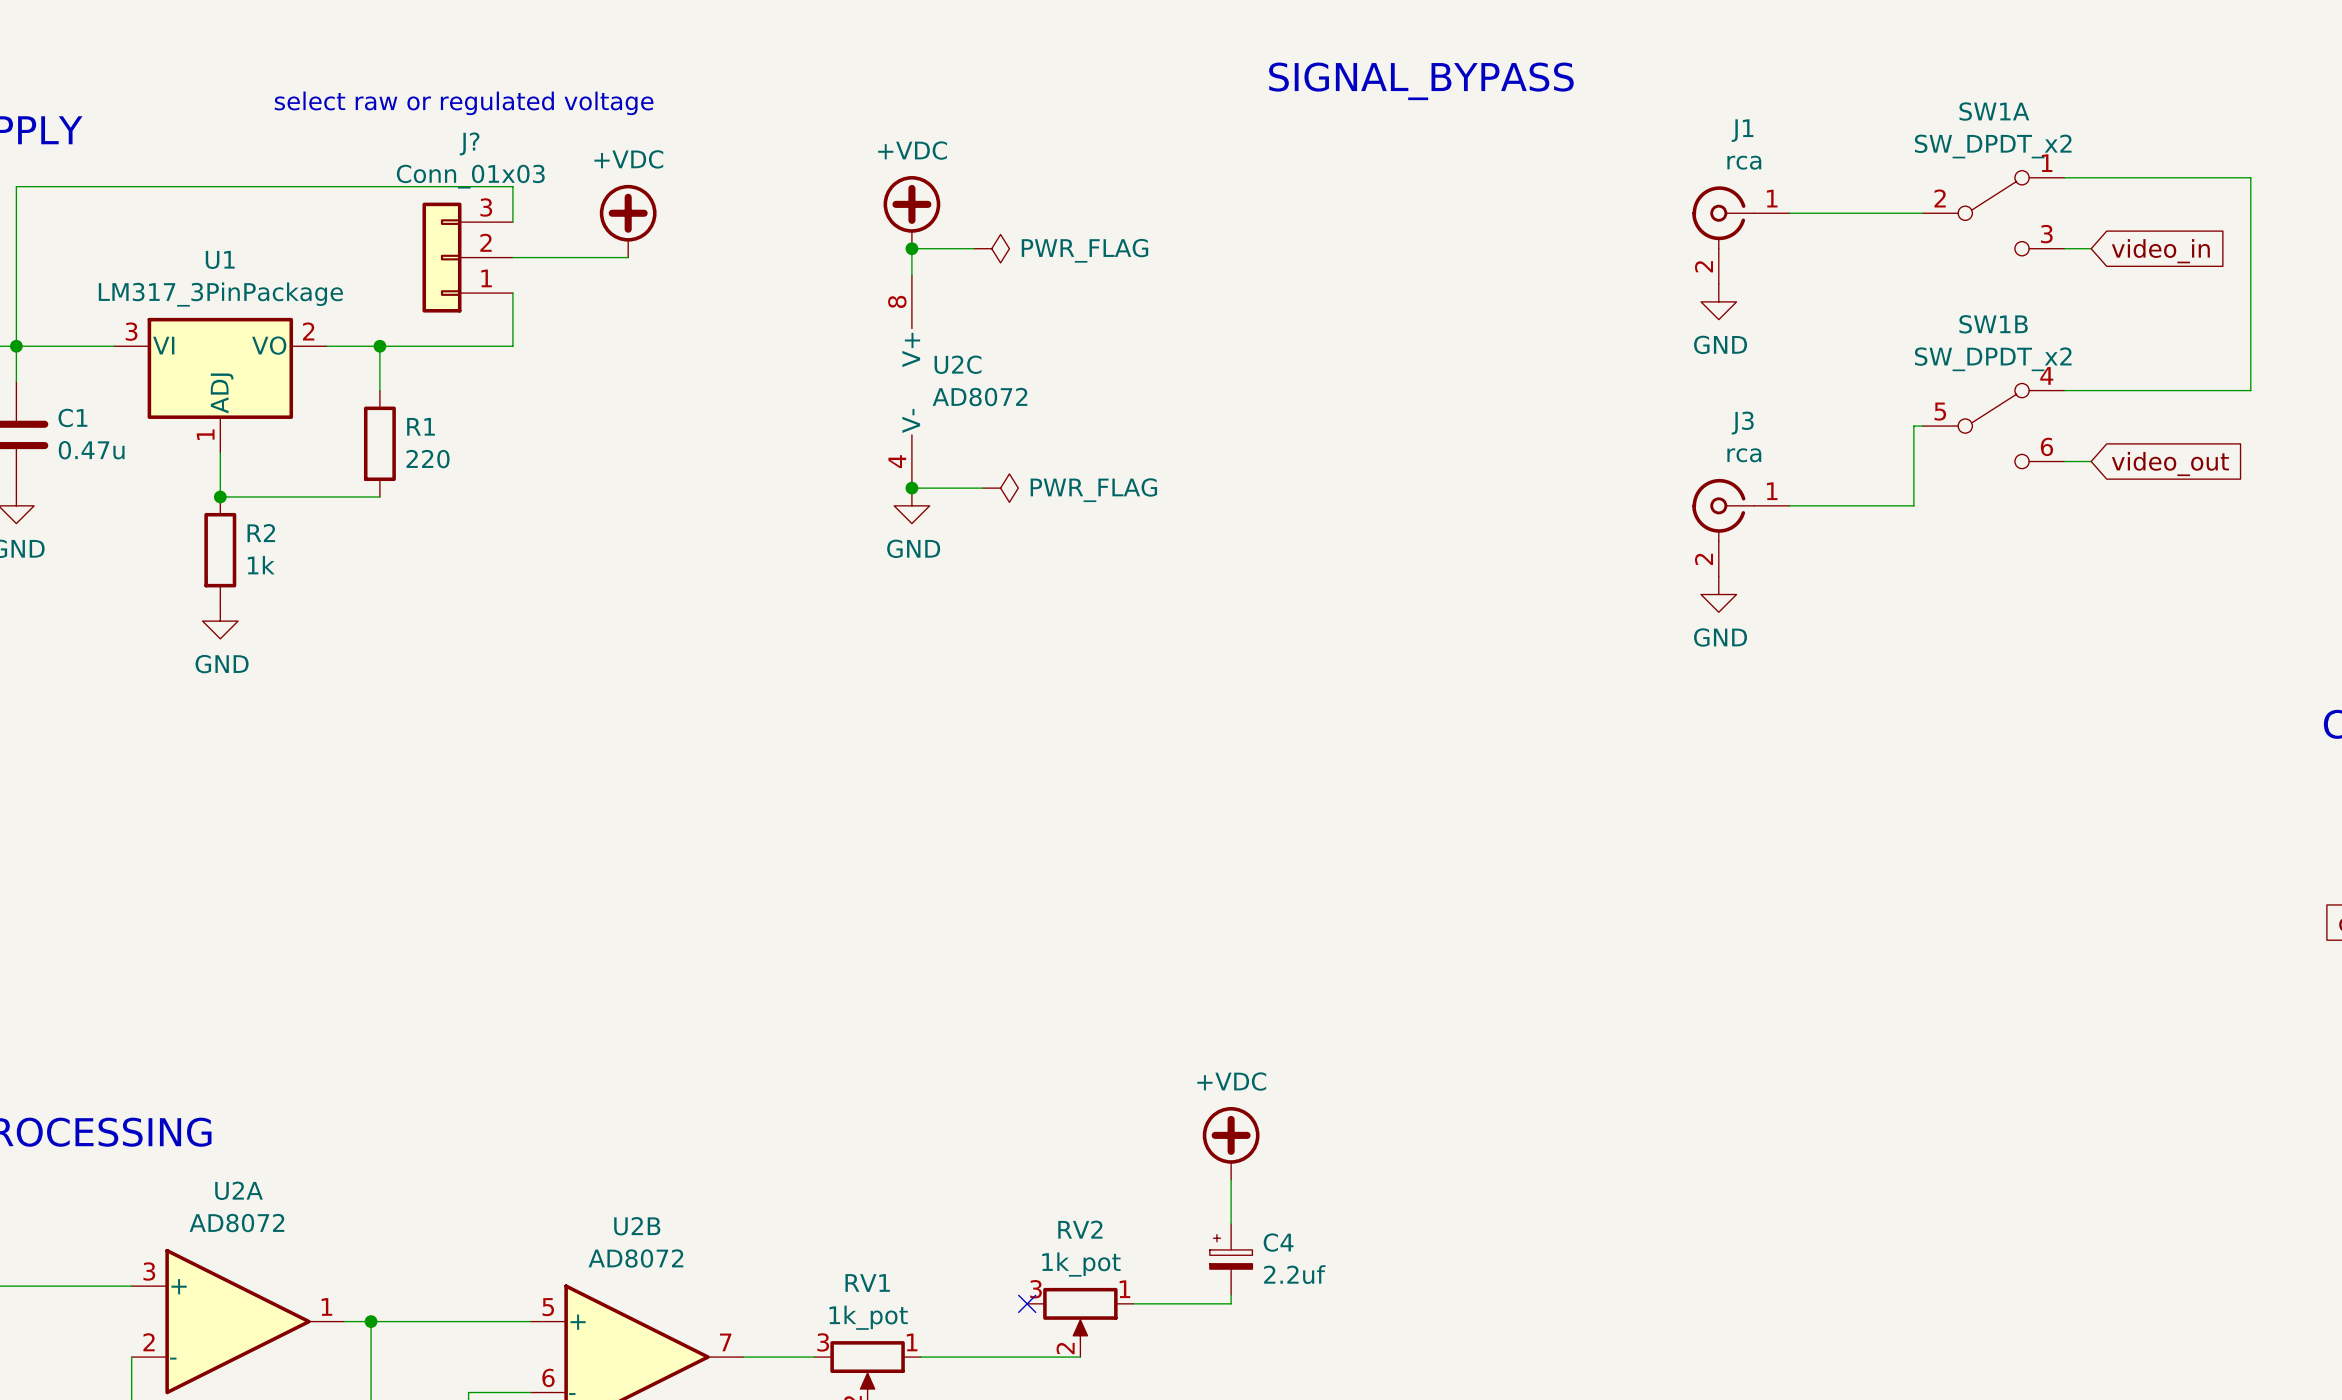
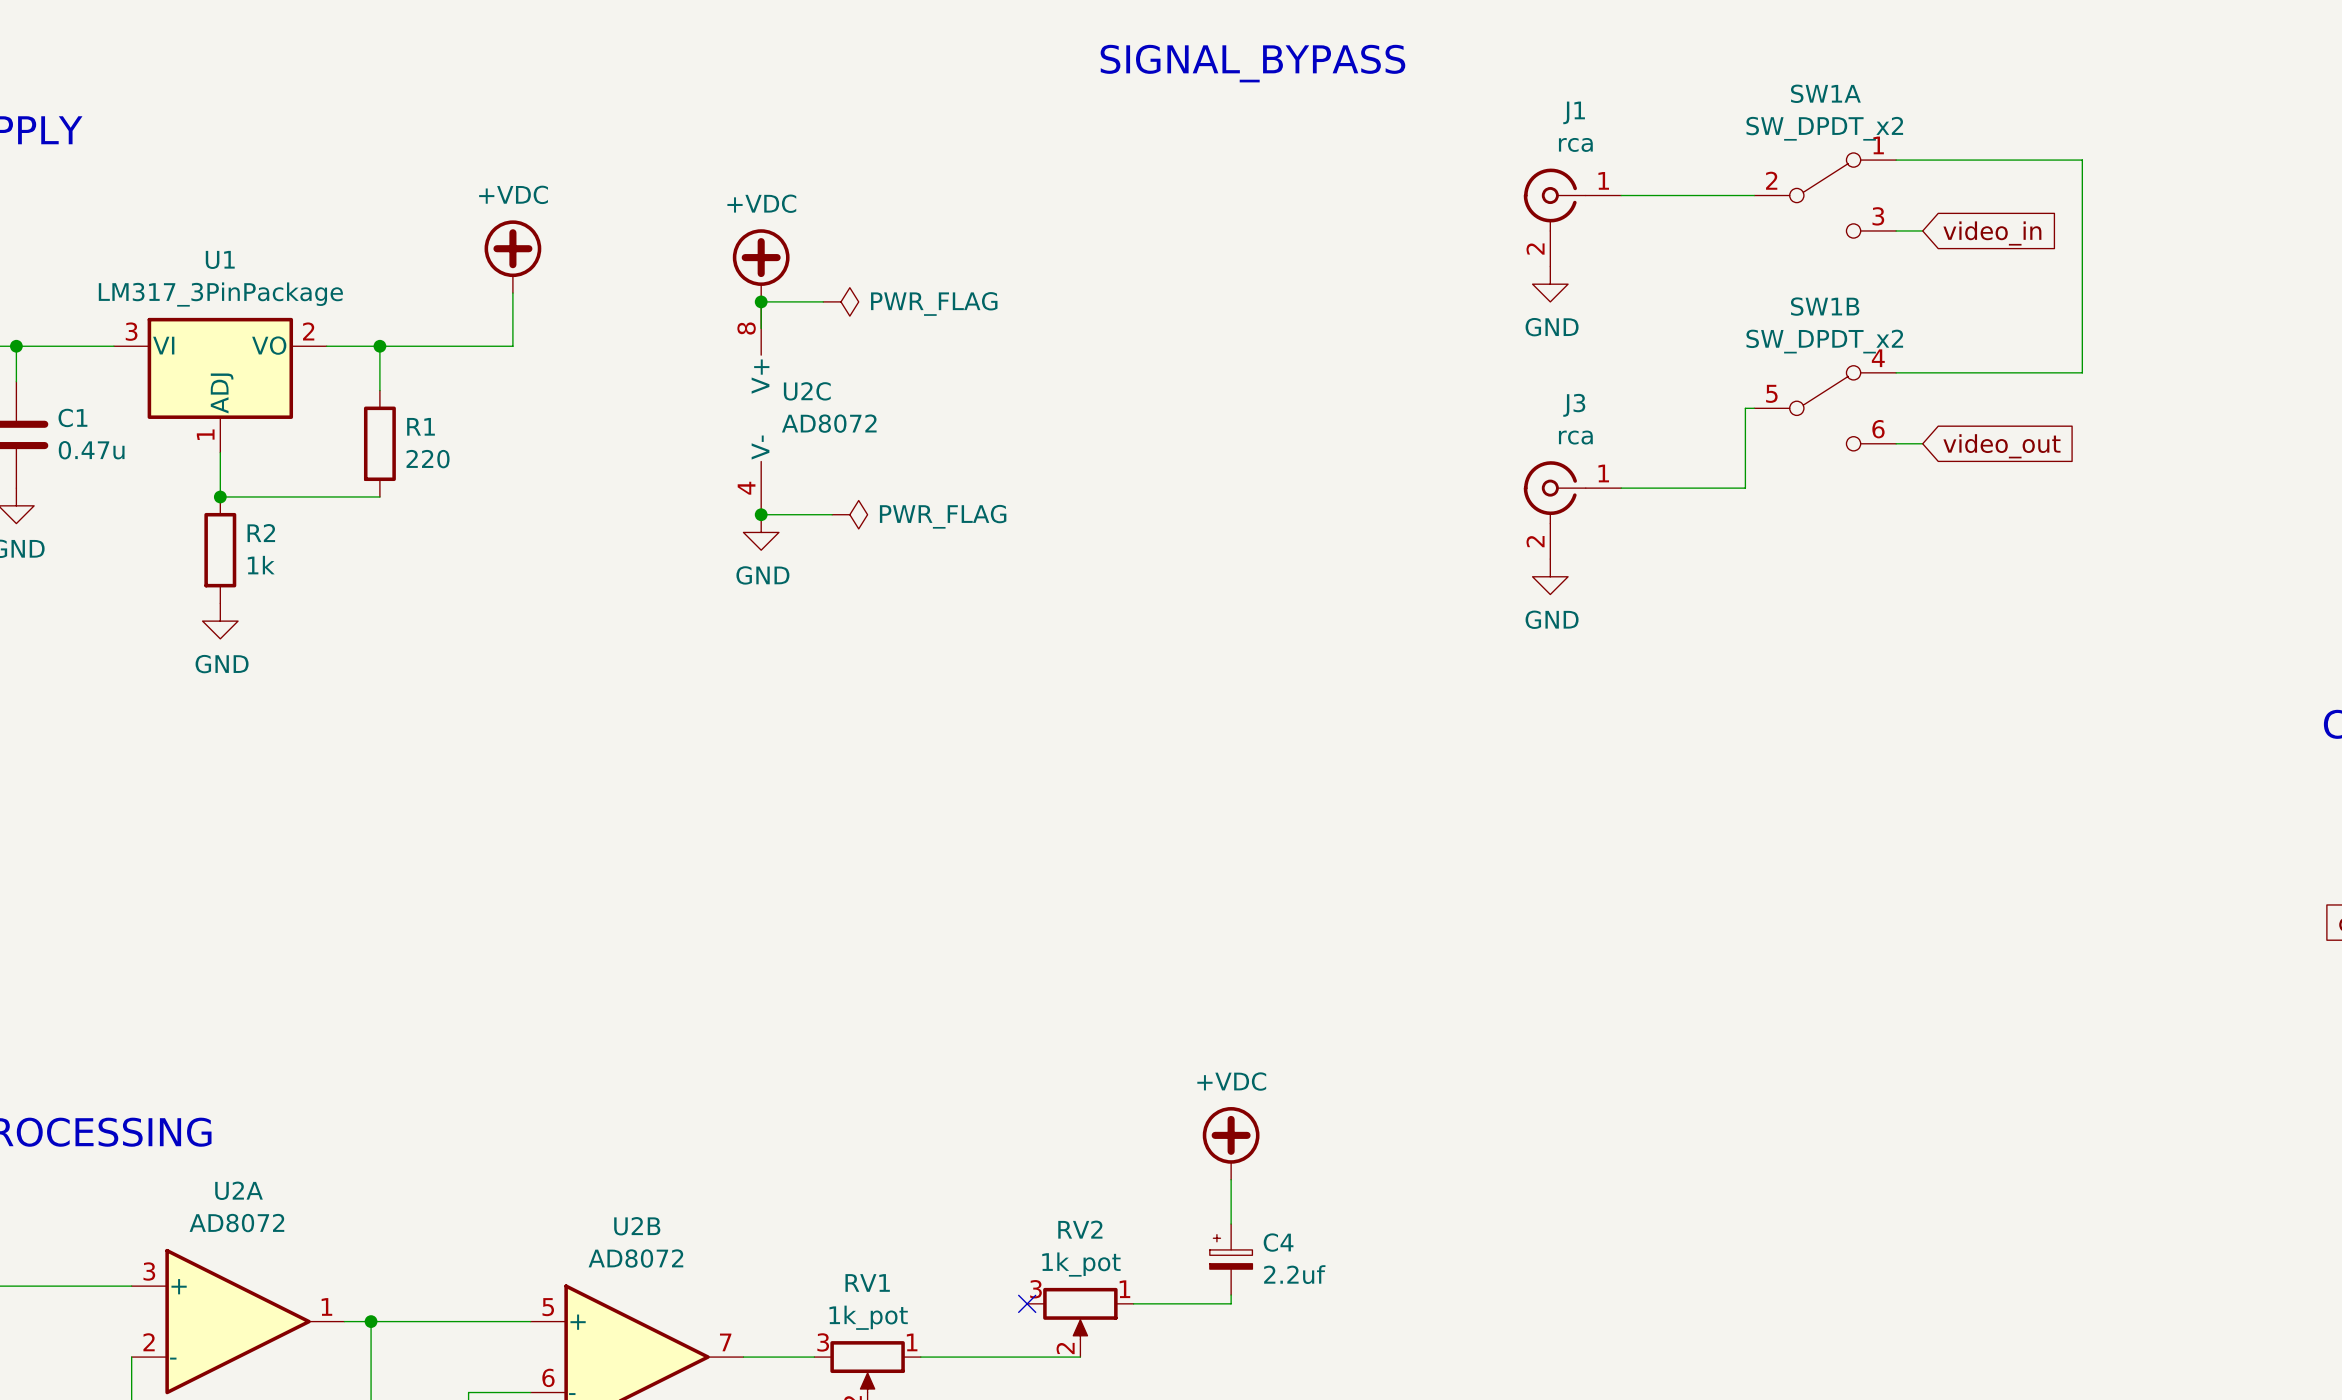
text position: SIGNAL_BYPASS (1421, 81) -> SIGNAL_BYPASS (1252, 63)
text: select raw or regulated voltage (464, 103) -> none
wire: (2064, 177) (2250, 177) (2250, 390) (2064, 390) -> (1896, 160) (2082, 160) (2082, 372) (1896, 372)
power symbol: +VDC (911, 212) -> none
wire: (1789, 213) (1922, 213) -> (1621, 195) (1754, 195)
SW1A position: (1993, 213) -> (1825, 195)
power symbol: +VDC (628, 221) -> none
wire: (512, 222) (512, 186) (16, 186) (16, 346) -> none
J1 position: (1740, 235) -> (1572, 217)
junction: (911, 248) -> none
wire: (973, 248) (911, 248) (911, 275) -> (823, 301) (761, 301) (761, 328)
power symbol: PWR_FLAG (991, 248) -> none
wire: (2064, 248) (2091, 248) -> (1896, 230) (1922, 230)
global label position: video_in (2160, 251) -> video_in (1992, 233)
power symbol: none -> +VDC (512, 256)
J?: Conn_01x03 (467, 257) -> none
wire: (512, 257) (628, 257) -> none
power symbol: none -> +VDC (761, 265)
power symbol: none -> GND (1550, 284)
junction: none -> (761, 301)
power symbol: none -> PWR_FLAG (840, 301)
power symbol: GND (1718, 301) -> none
U2C position: (911, 381) -> (761, 408)
wire: (1922, 426) (1913, 426) (1913, 505) (1789, 505) -> (1754, 408) (1745, 408) (1745, 488) (1621, 488)
SW1B position: (1993, 426) -> (1825, 408)
wire: (2064, 461) (2091, 461) -> (1896, 443) (1922, 443)
global label position: video_out (2170, 464) -> video_out (2001, 446)
wire: (911, 488) (982, 488) -> (761, 514) (832, 514)
junction: (911, 488) -> none
power symbol: PWR_FLAG (1000, 488) -> none
power symbol position: GND (911, 505) -> GND (761, 532)
junction: none -> (761, 514)
power symbol: none -> PWR_FLAG (849, 514)
J3 position: (1740, 527) -> (1572, 510)
power symbol: none -> GND (1550, 576)
power symbol: GND (1718, 594) -> none

